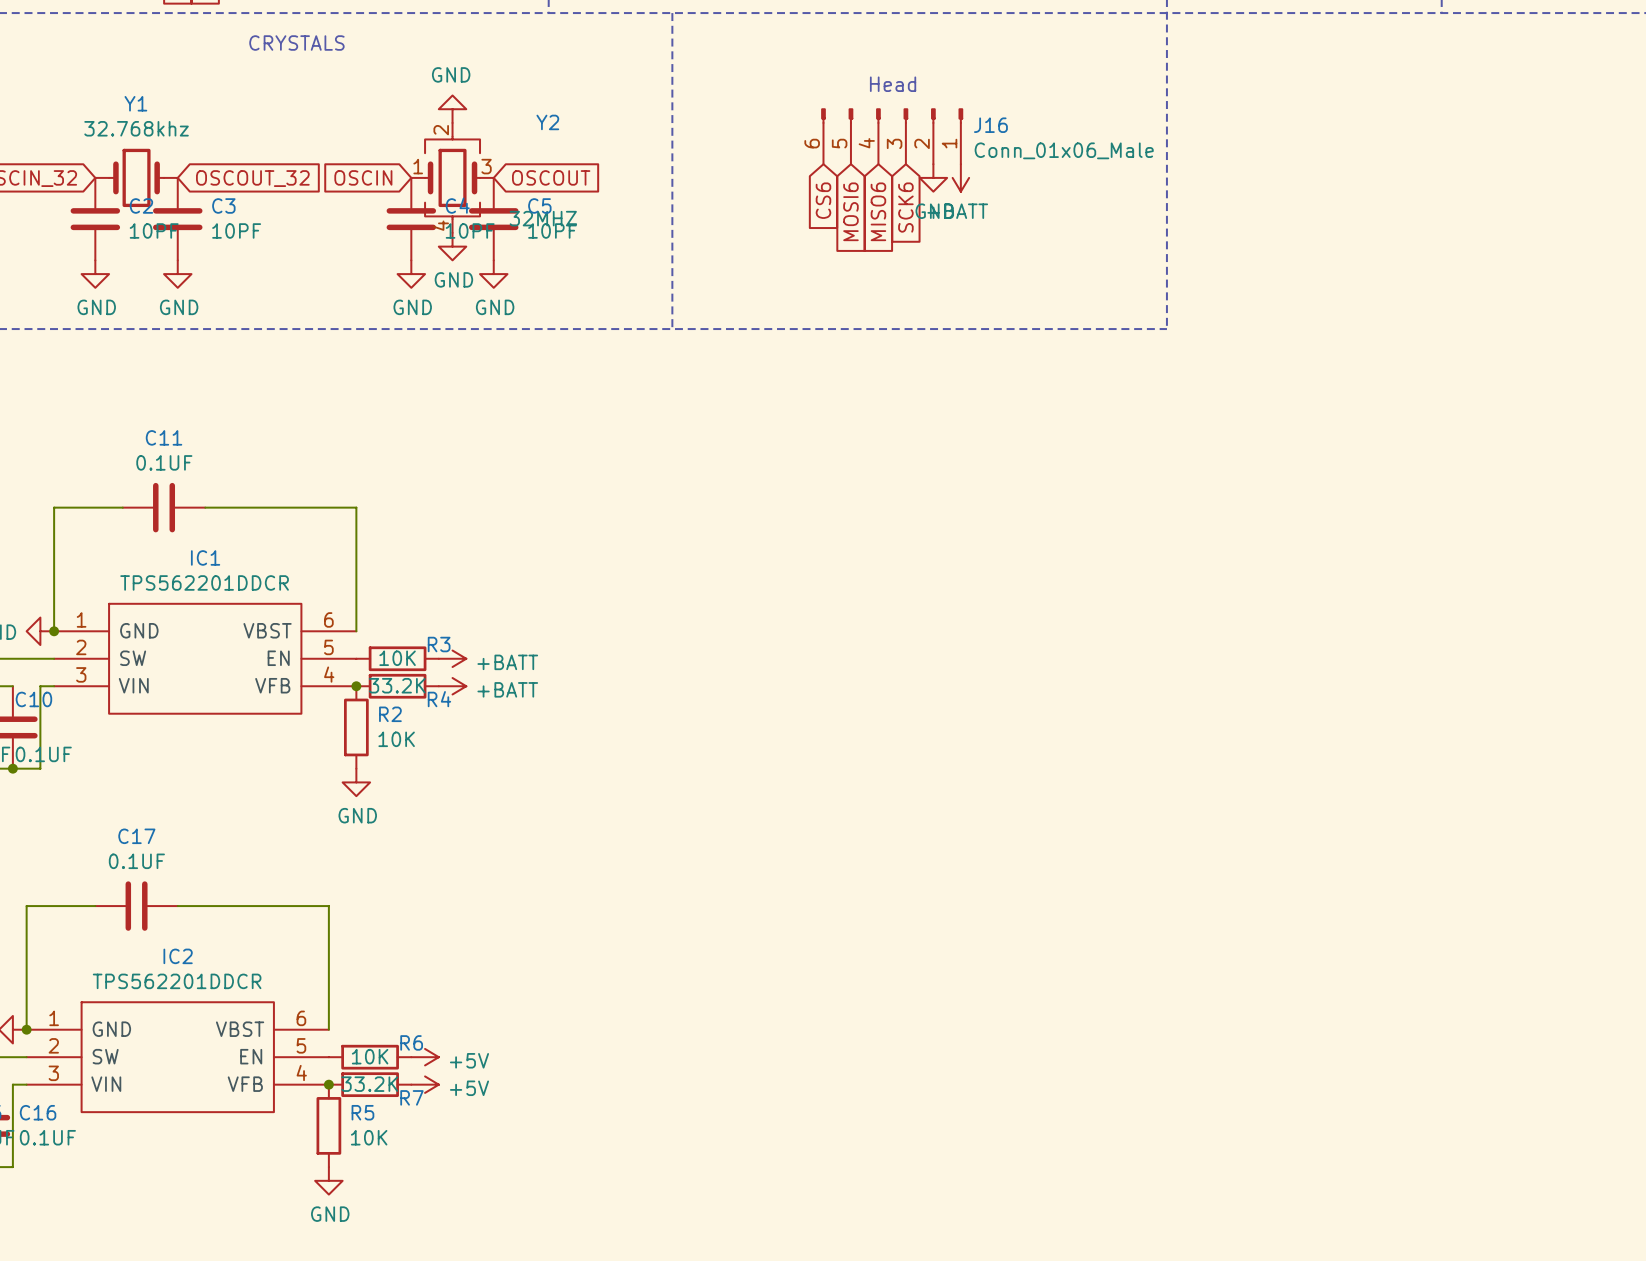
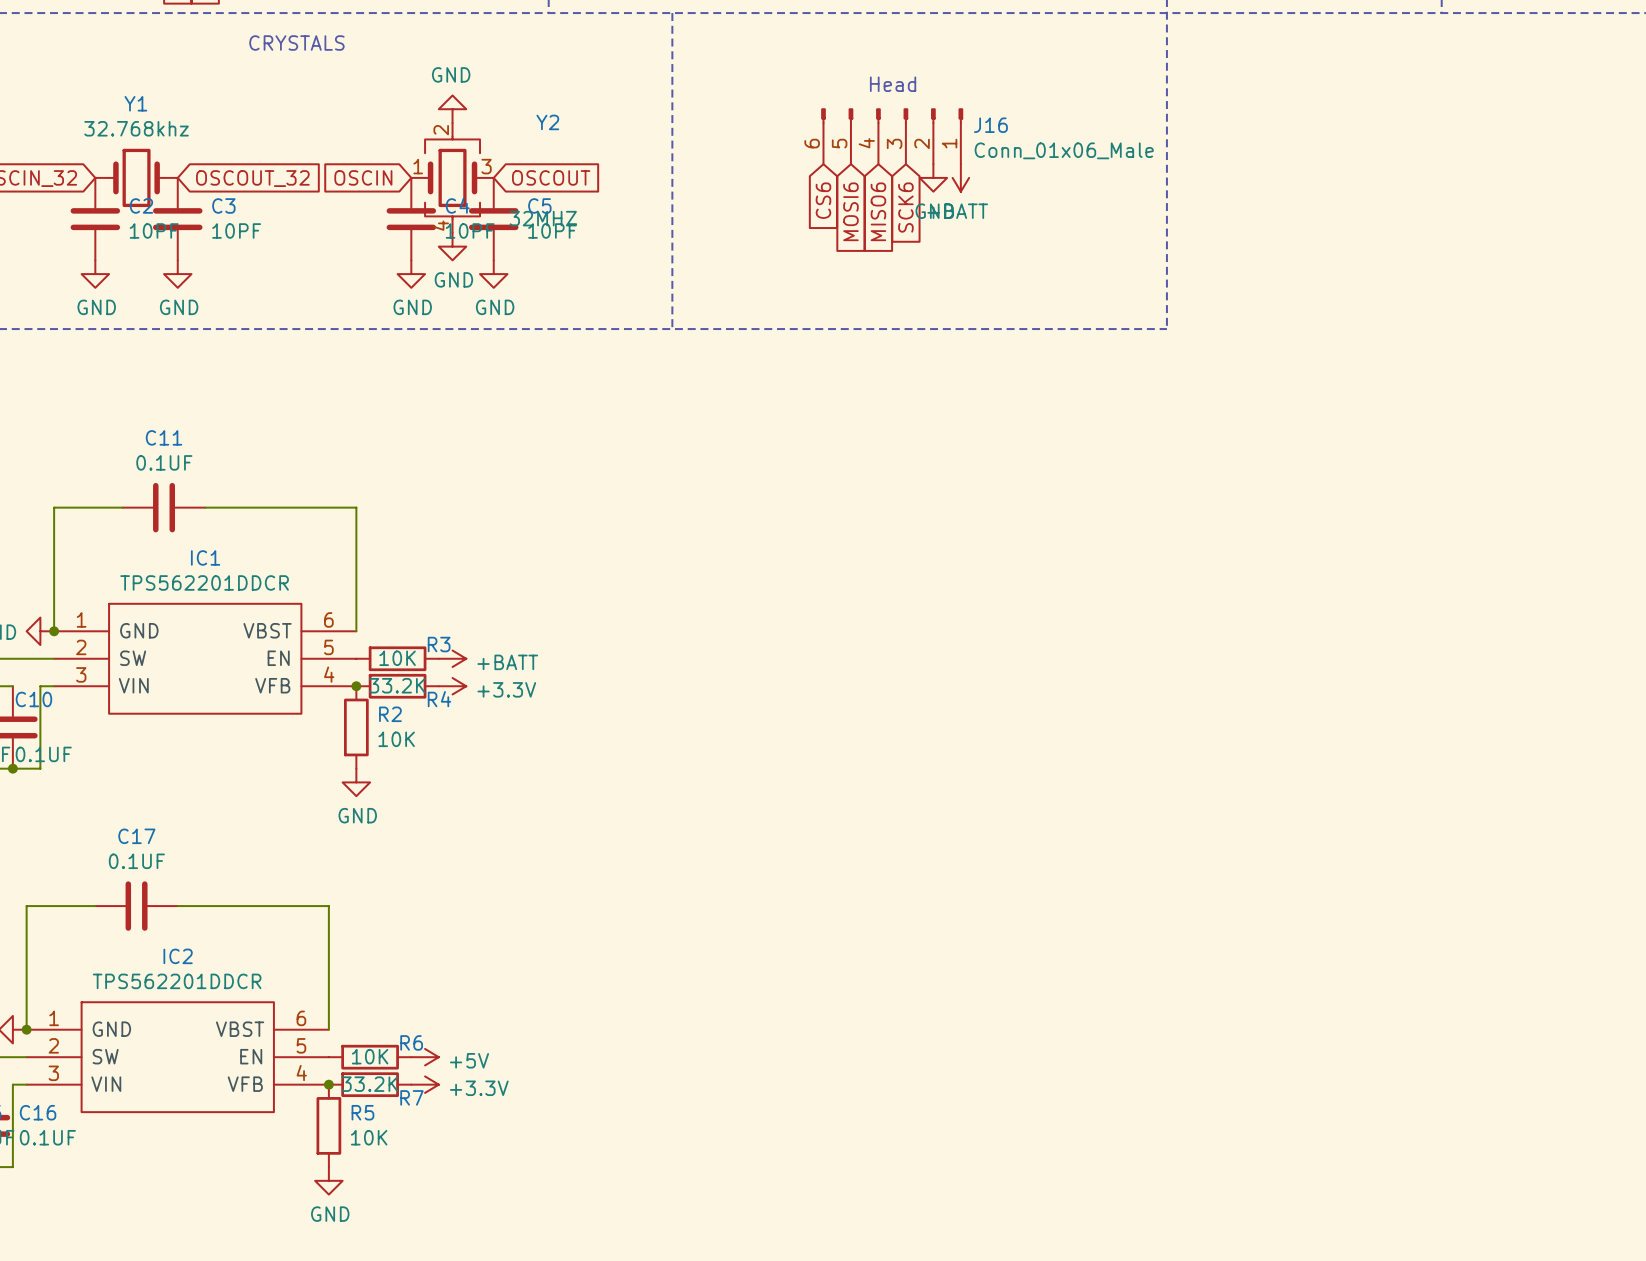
power symbol: +BATT (452, 686) -> +3.3V (452, 686)
power symbol: +5V (425, 1084) -> +3.3V (425, 1084)

